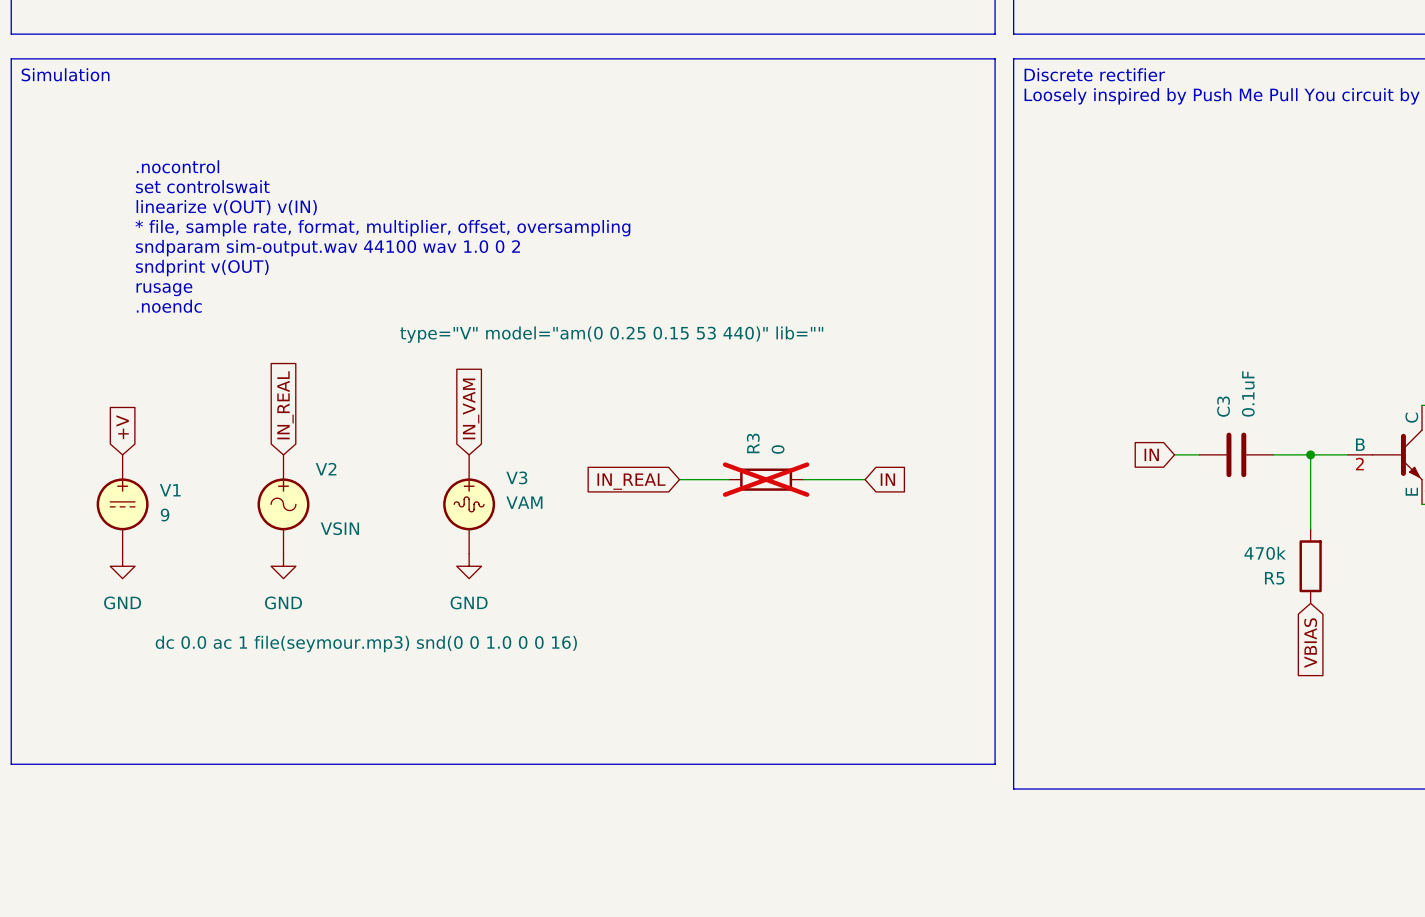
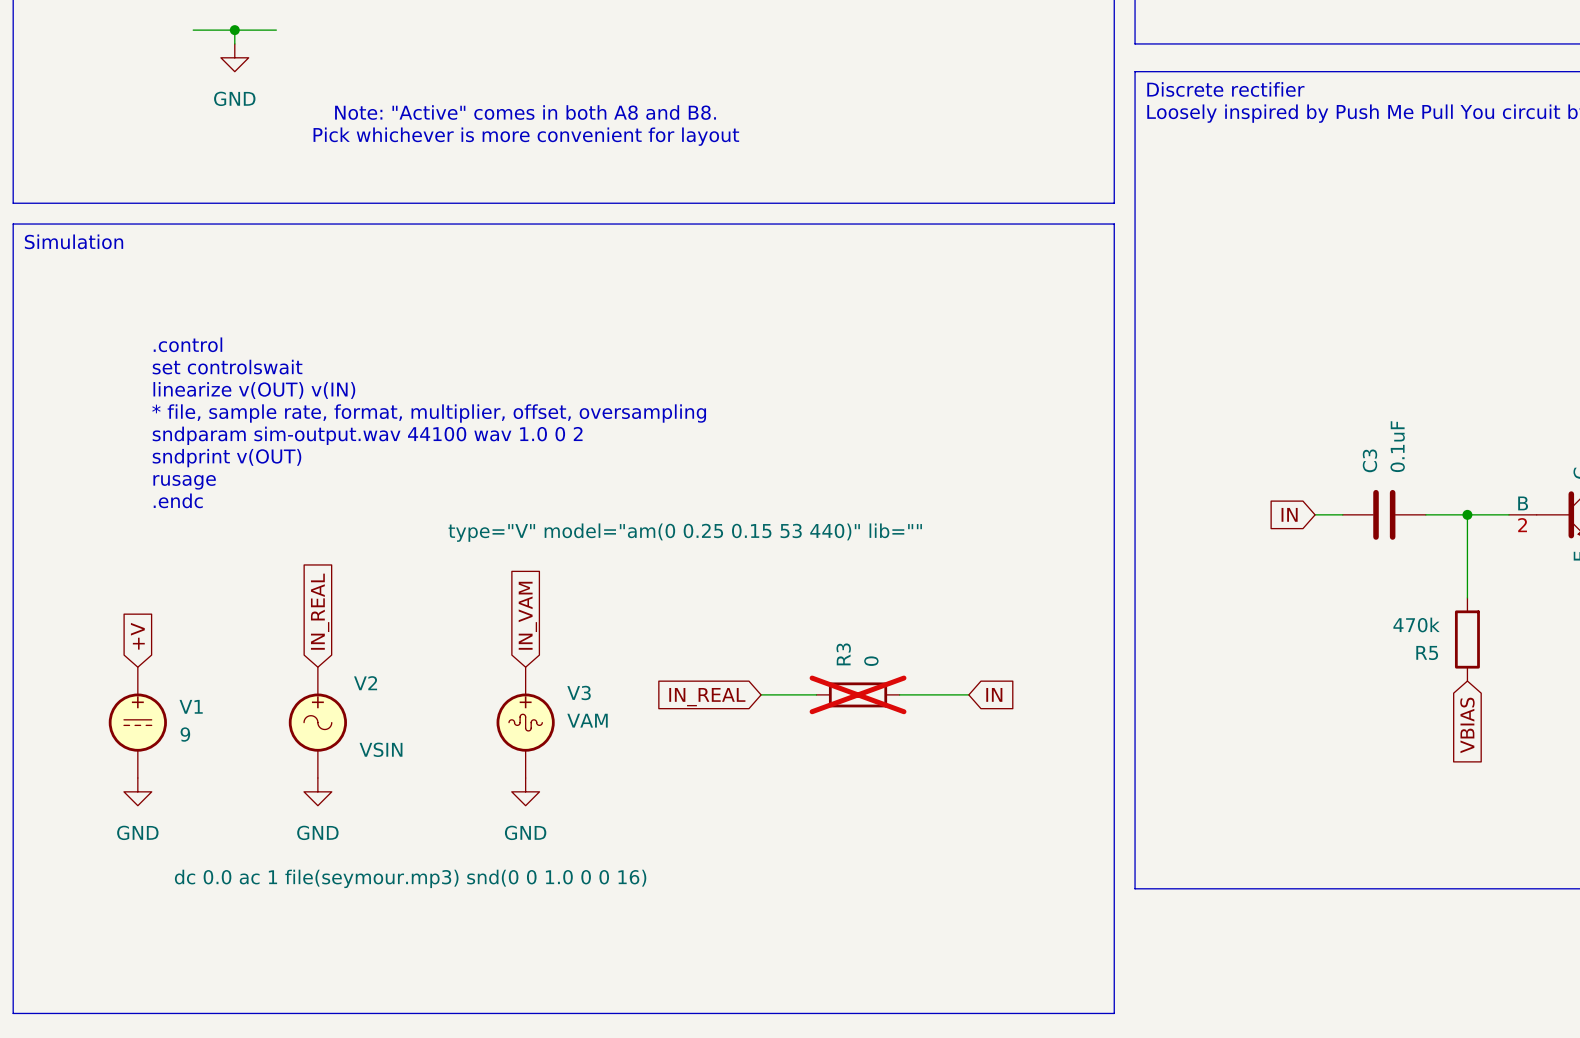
wire: none -> (193, 30) (276, 30)
wire: none -> (234, 30) (234, 43)
junction: none -> (234, 30)
line: (11, 34) (995, 34) -> (13, 43) (13, 71)
power symbol: none -> GND (234, 57)
line: (11, 58) (995, 58) -> (1114, 43) (1114, 71)
text position: Simulation (65, 74) -> Simulation (74, 241)
text: none -> Note: "Active" comes in both A8 and B8. (525, 112)
text: none -> Pick whichever is more convenient for layout (526, 136)
text: .nocontrol (177, 166) -> none
line: (11, 176) (11, 195) -> (13, 203) (1114, 203)
line: (995, 176) (995, 195) -> (13, 224) (1114, 224)
text position: set controlswait (202, 186) -> set controlswait (227, 367)
text position: linearize v(OUT) v(IN) (226, 207) -> linearize v(OUT) v(IN) (254, 390)
text position: * file, sample rate, format, multiplier, offset, oversampling (382, 228) -> * file, sample rate, format, multiplier, offset, oversampling (429, 413)
text position: sndparam sim-output.wav 44100 wav 1.0 0 2 (327, 248) -> sndparam sim-output.wav 44100 wav 1.0 0 2 (367, 435)
text position: sndprint v(OUT) (202, 268) -> sndprint v(OUT) (226, 458)
text position: rusage (164, 289) -> rusage (184, 482)
text: .noendc (169, 306) -> .control (187, 344)
global label position: IN_REAL (285, 405) -> IN_REAL (320, 611)
global label position: IN_VAM (471, 408) -> IN_VAM (527, 615)
global label position: +V (122, 427) -> +V (137, 636)
text: none -> .endc (178, 500)
wire: (679, 479) (729, 479) -> (761, 694) (816, 694)
R3 position: (766, 479) -> (858, 694)
wire: (803, 479) (865, 479) -> (899, 694) (968, 694)
global label position: IN (887, 479) -> IN (994, 694)
global label position: IN_REAL (631, 481) -> IN_REAL (707, 697)
V1 position: (122, 504) -> (137, 722)
V2 position: (283, 504) -> (317, 722)
V3 position: (469, 504) -> (525, 722)
power symbol: GND (122, 566) -> none
power symbol: GND (283, 566) -> none
power symbol: GND (469, 566) -> none
power symbol: none -> GND (137, 791)
power symbol: none -> GND (317, 791)
power symbol: none -> GND (525, 791)
line: (11, 764) (995, 764) -> (13, 861) (13, 1013) (1114, 1013) (1114, 861)

